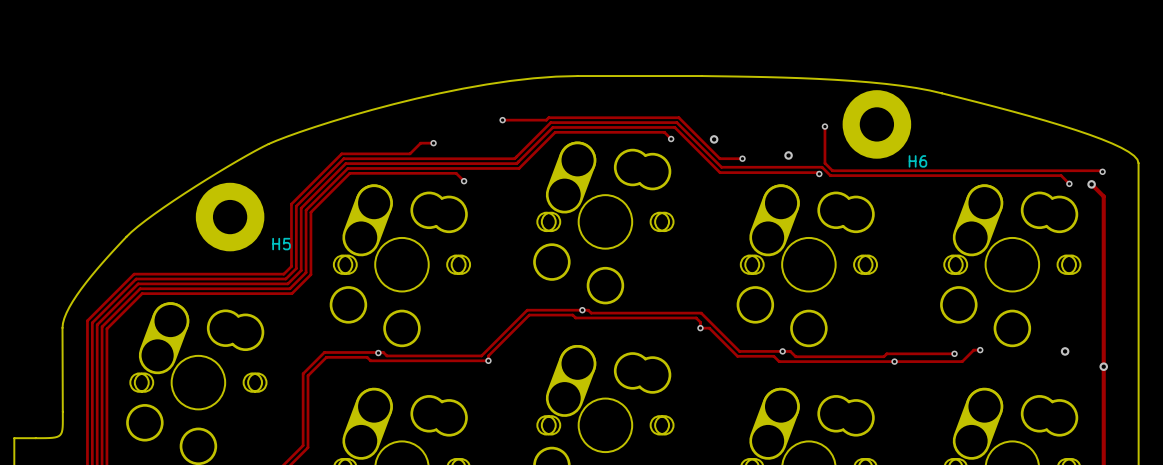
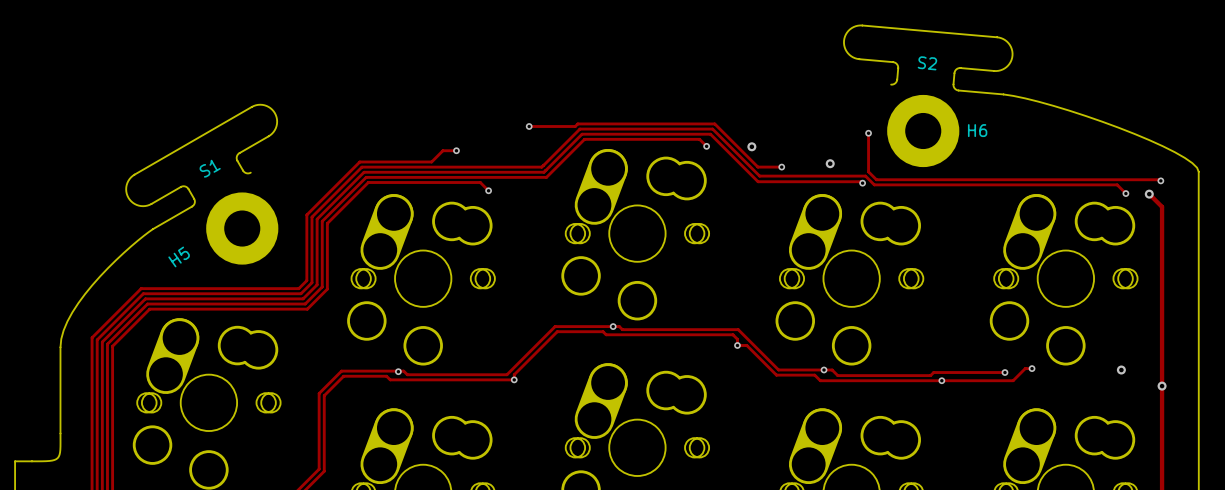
S2: none -> (928, 57)
S1: none -> (201, 155)
H6 name position: H6 (917, 161) -> H6 (977, 130)
board edge: (1138, 163) (1134, 155) (1112, 143) (1029, 116) (929, 90) (851, 80) (723, 76) (556, 76) (486, 84) (393, 104) (315, 126) (268, 144) (195, 186) (131, 232) (86, 282) (72, 301) (64, 318) (62, 327) (61, 433) (54, 437) (30, 438) -> (1198, 171) (1192, 163) (1162, 146) (1085, 116) (1013, 95) (958, 90)
board edge: none -> (192, 206) (153, 229) (131, 246) (100, 276) (72, 312) (63, 330) (60, 347) (59, 454) (52, 460) (31, 461)
H5 name rotation: 0° (281, 244) -> 35° counterclockwise (179, 256)
H5 name position: H5 (281, 244) -> H5 (179, 256)

